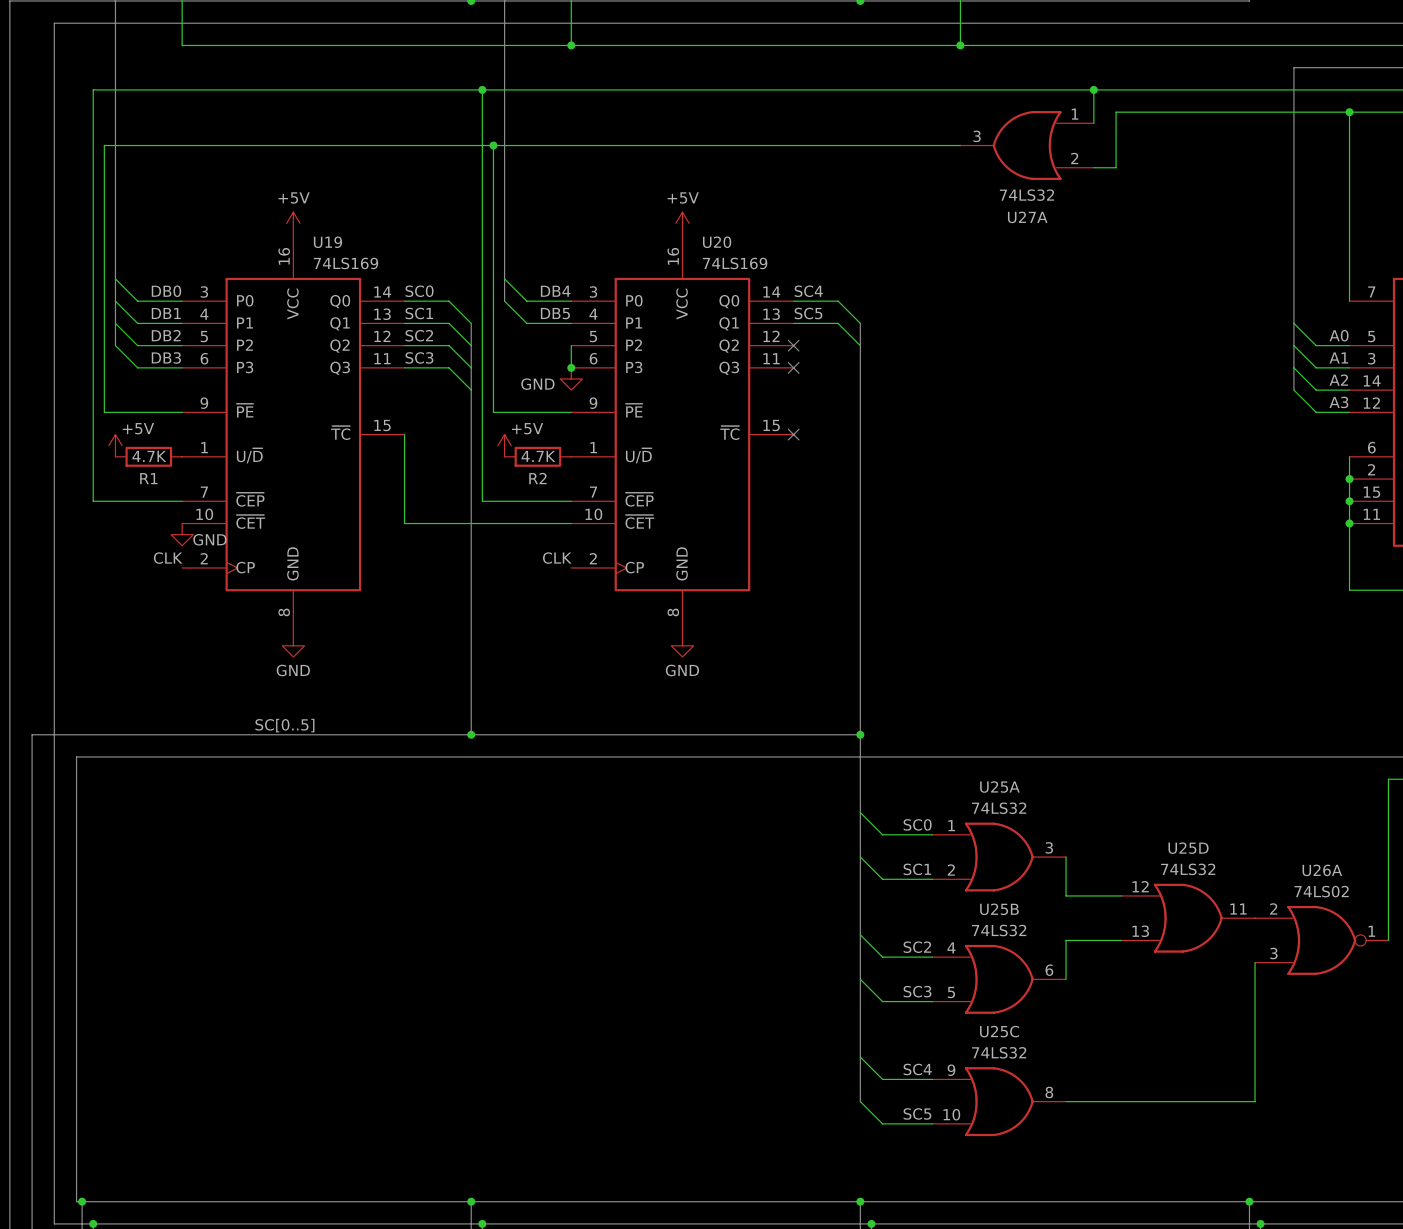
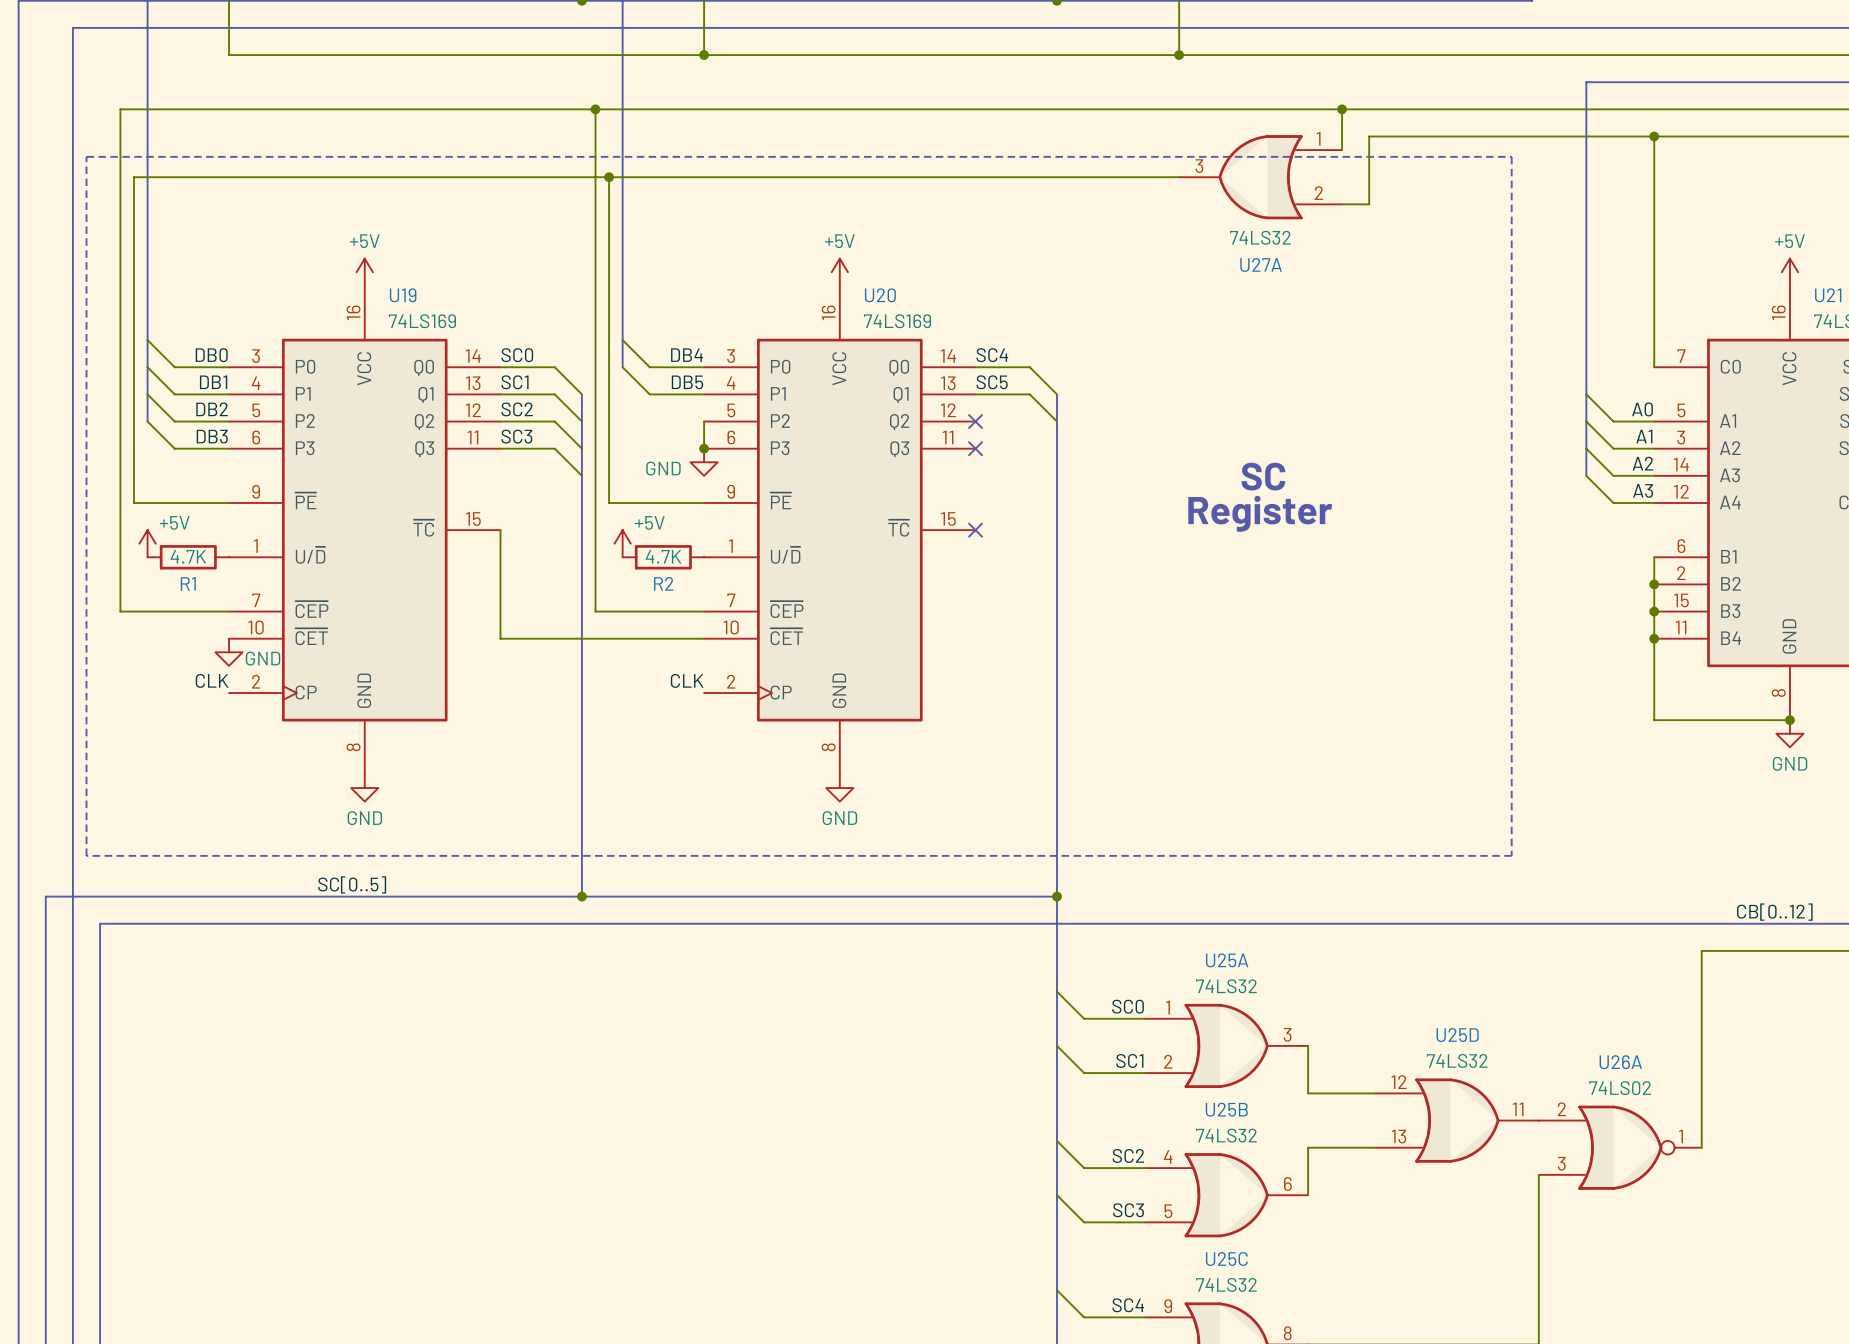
line: none -> (86, 156) (1511, 156) (1511, 855) (86, 855) (86, 156)
text: none -> SC (1263, 476)
text: none -> Register (1260, 513)

